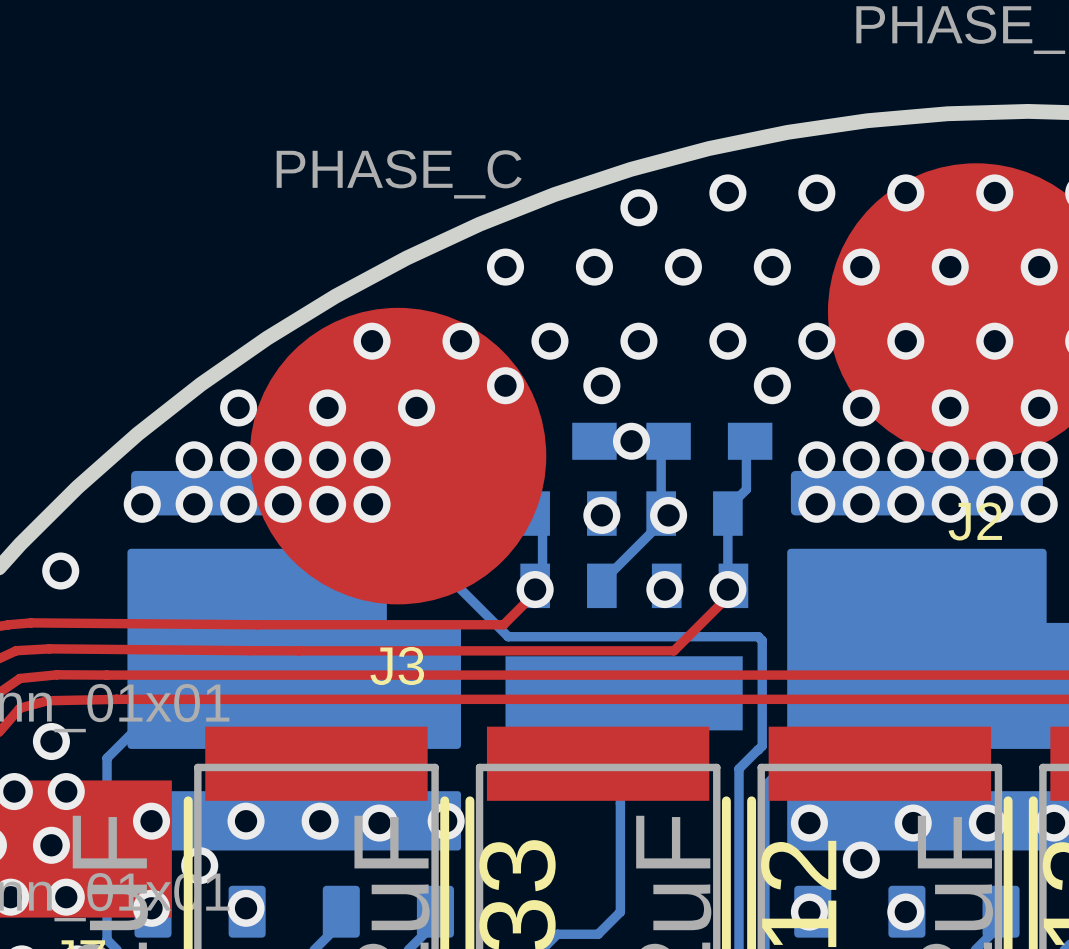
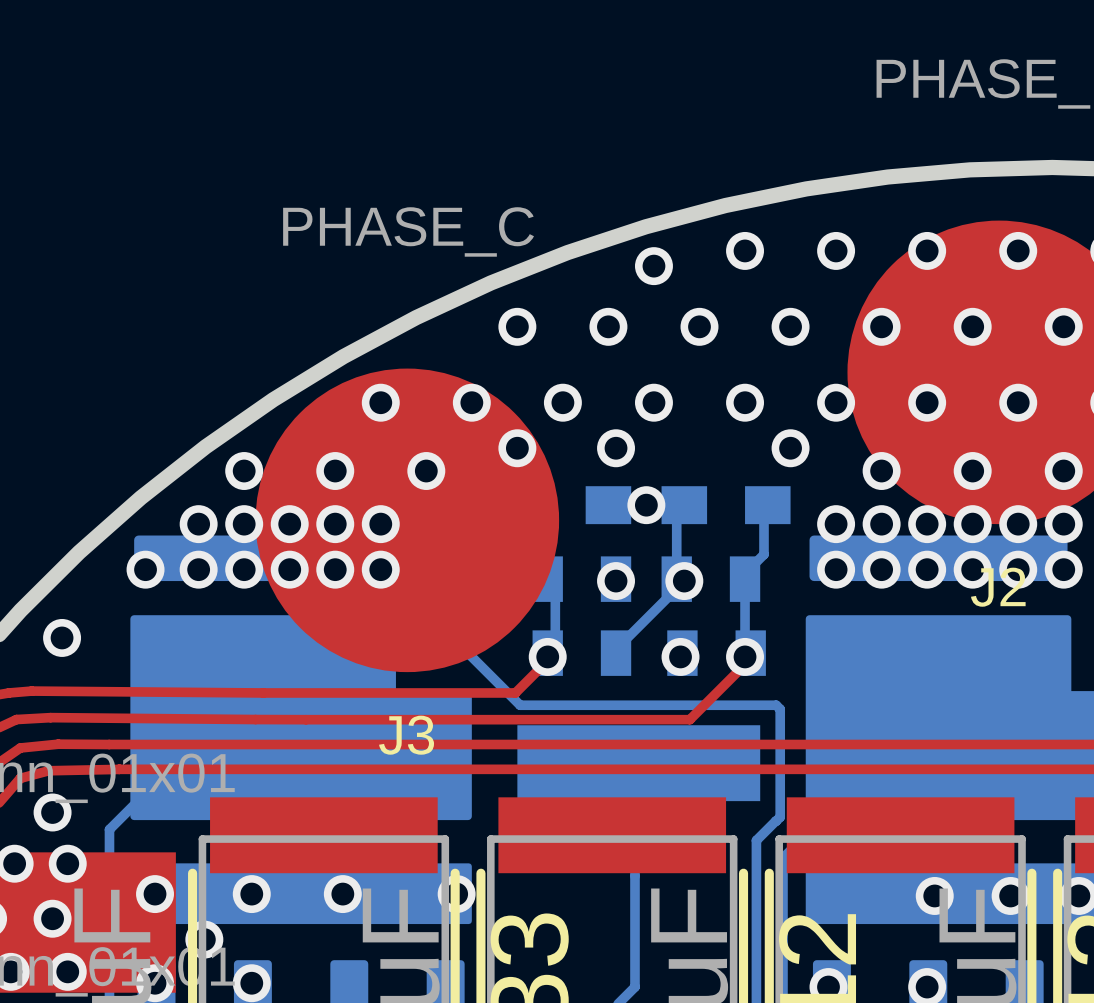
via position: (320, 821) -> (342, 894)
via: (379, 823) -> none
via: (809, 823) -> none
via: (861, 860) -> none

